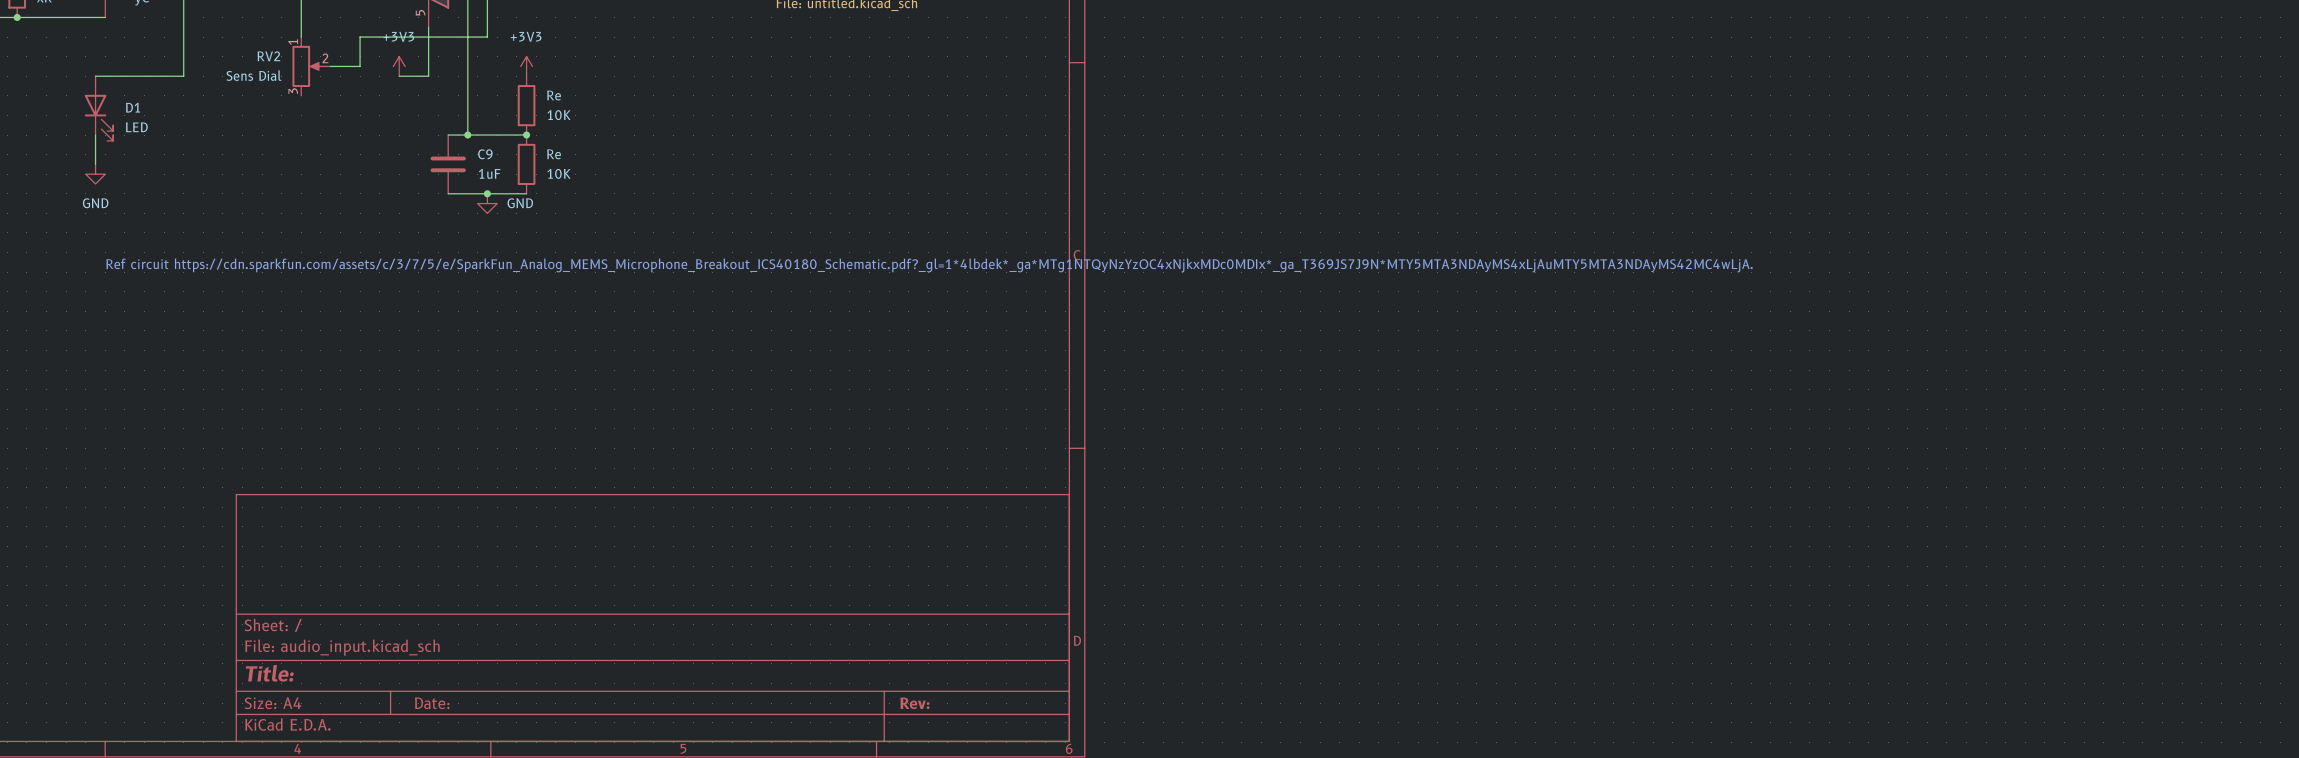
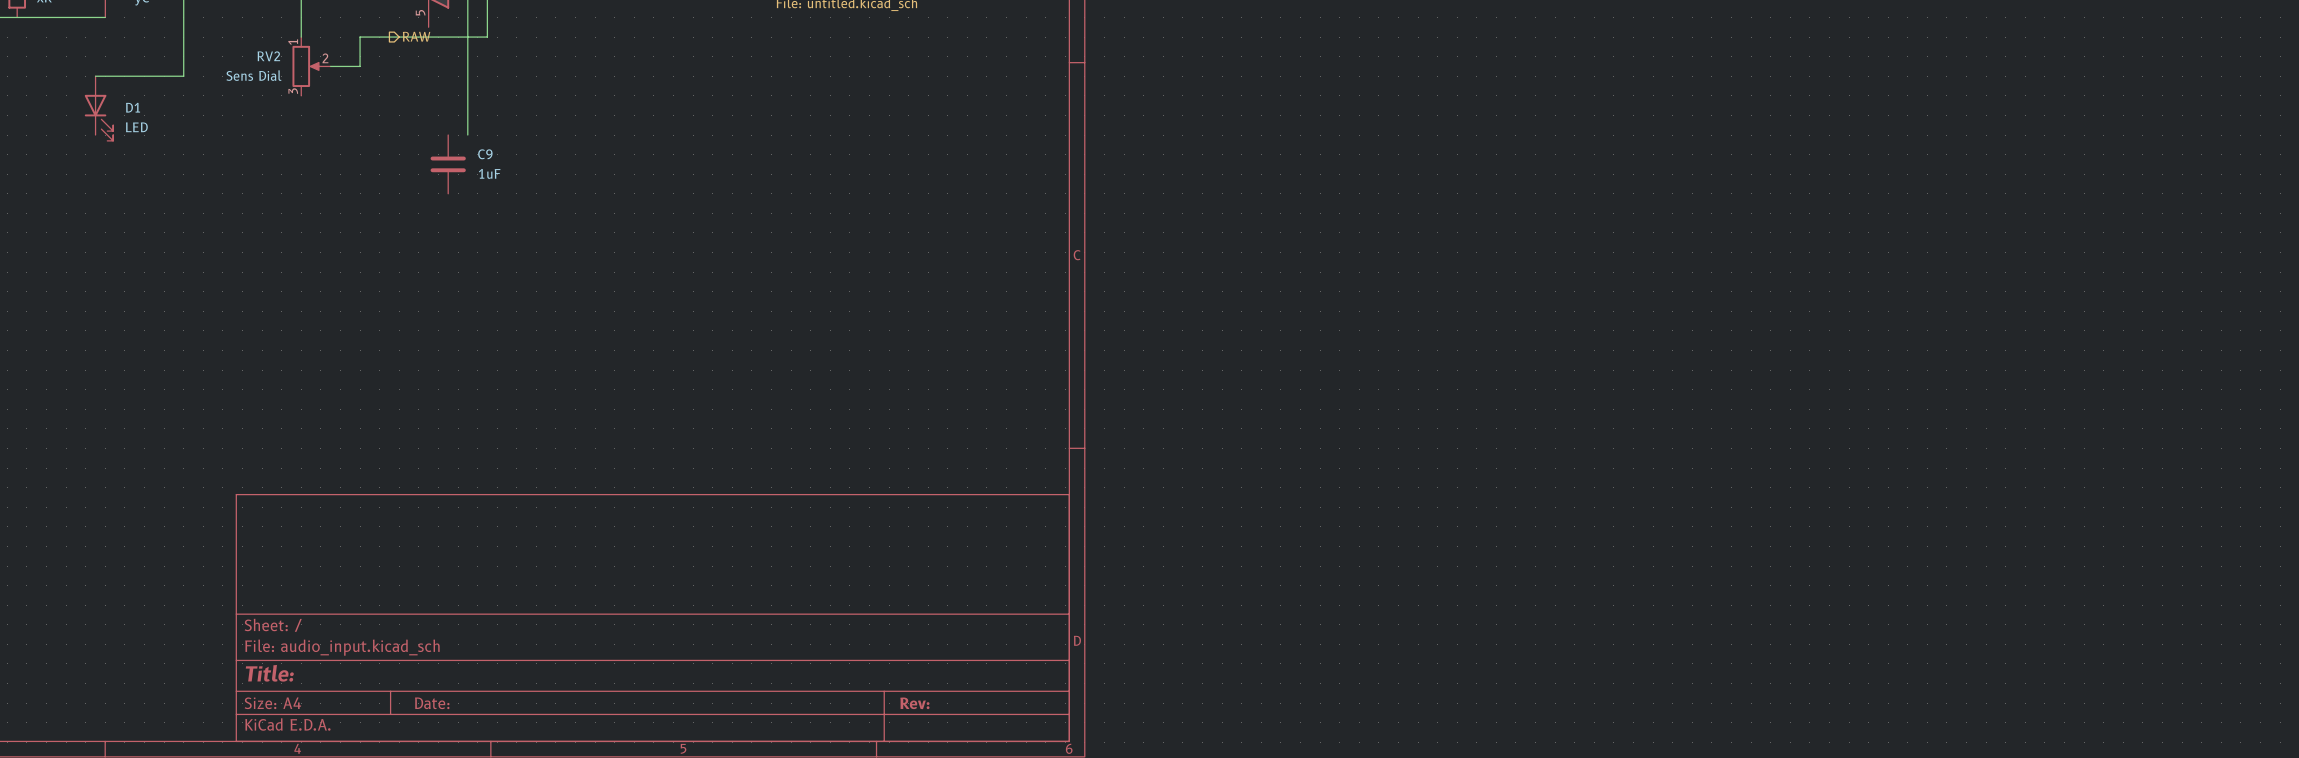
junction: (17, 17) -> none
wire: (428, 27) (428, 76) (399, 76) -> none
hierarchical label: none -> RAW (416, 36)
power symbol: +3V3 (399, 66) -> none
power symbol: +3V3 (526, 66) -> none
Re: 10K (526, 105) -> none
wire: (95, 135) (95, 164) -> none
wire: (448, 135) (526, 135) -> none
junction: (467, 135) -> none
junction: (526, 135) -> none
Re: 10K (526, 164) -> none
power symbol: GND (95, 174) -> none
wire: (448, 193) (526, 193) -> none
junction: (487, 193) -> none
power symbol: GND (487, 203) -> none
text: Ref circuit https://cdn.sparkfun.com/assets/c/3/7/5/e/SparkFun_Analog_MEMS_Microphone_Breakout_ICS40180_Schematic.pdf?_gl=1*4lbdek*_ga*MTg1NTQyNzYzOC4xNjkxMDc0MDIx*_ga_T369JS7J9N*MTY5MTA3NDAyMS4xLjAuMTY5MTA3NDAyMS42MC4wLjA. (929, 265) -> none

